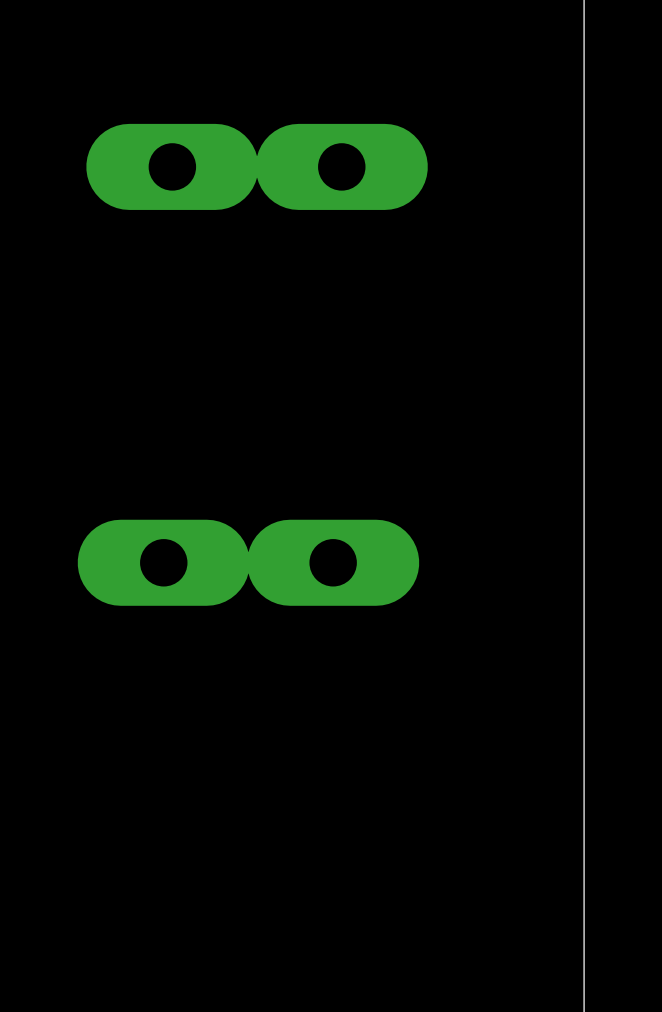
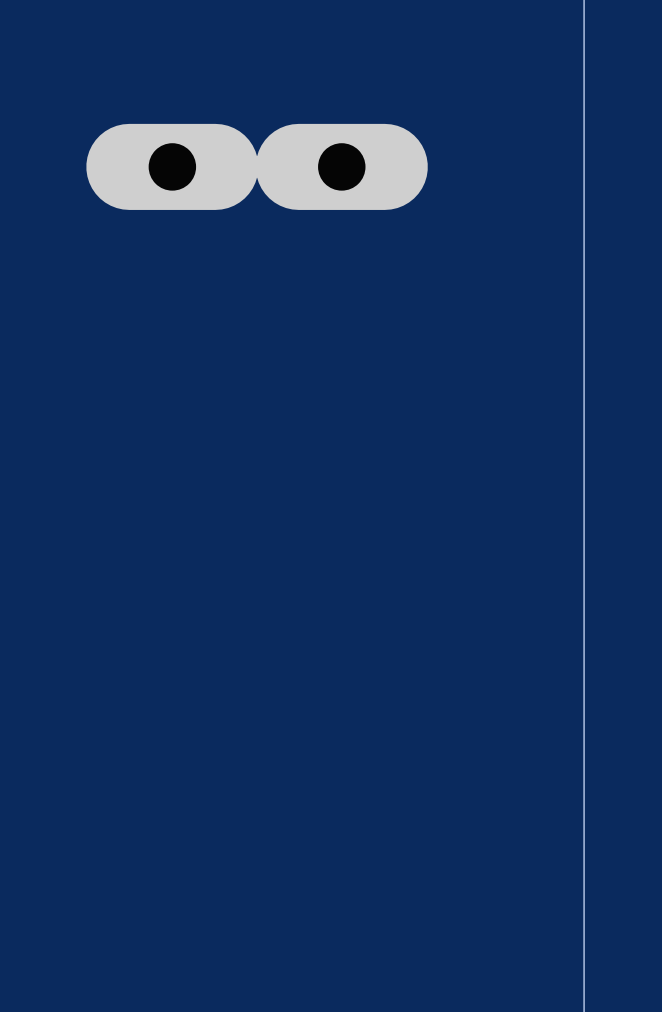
part: (248, 562) -> none

